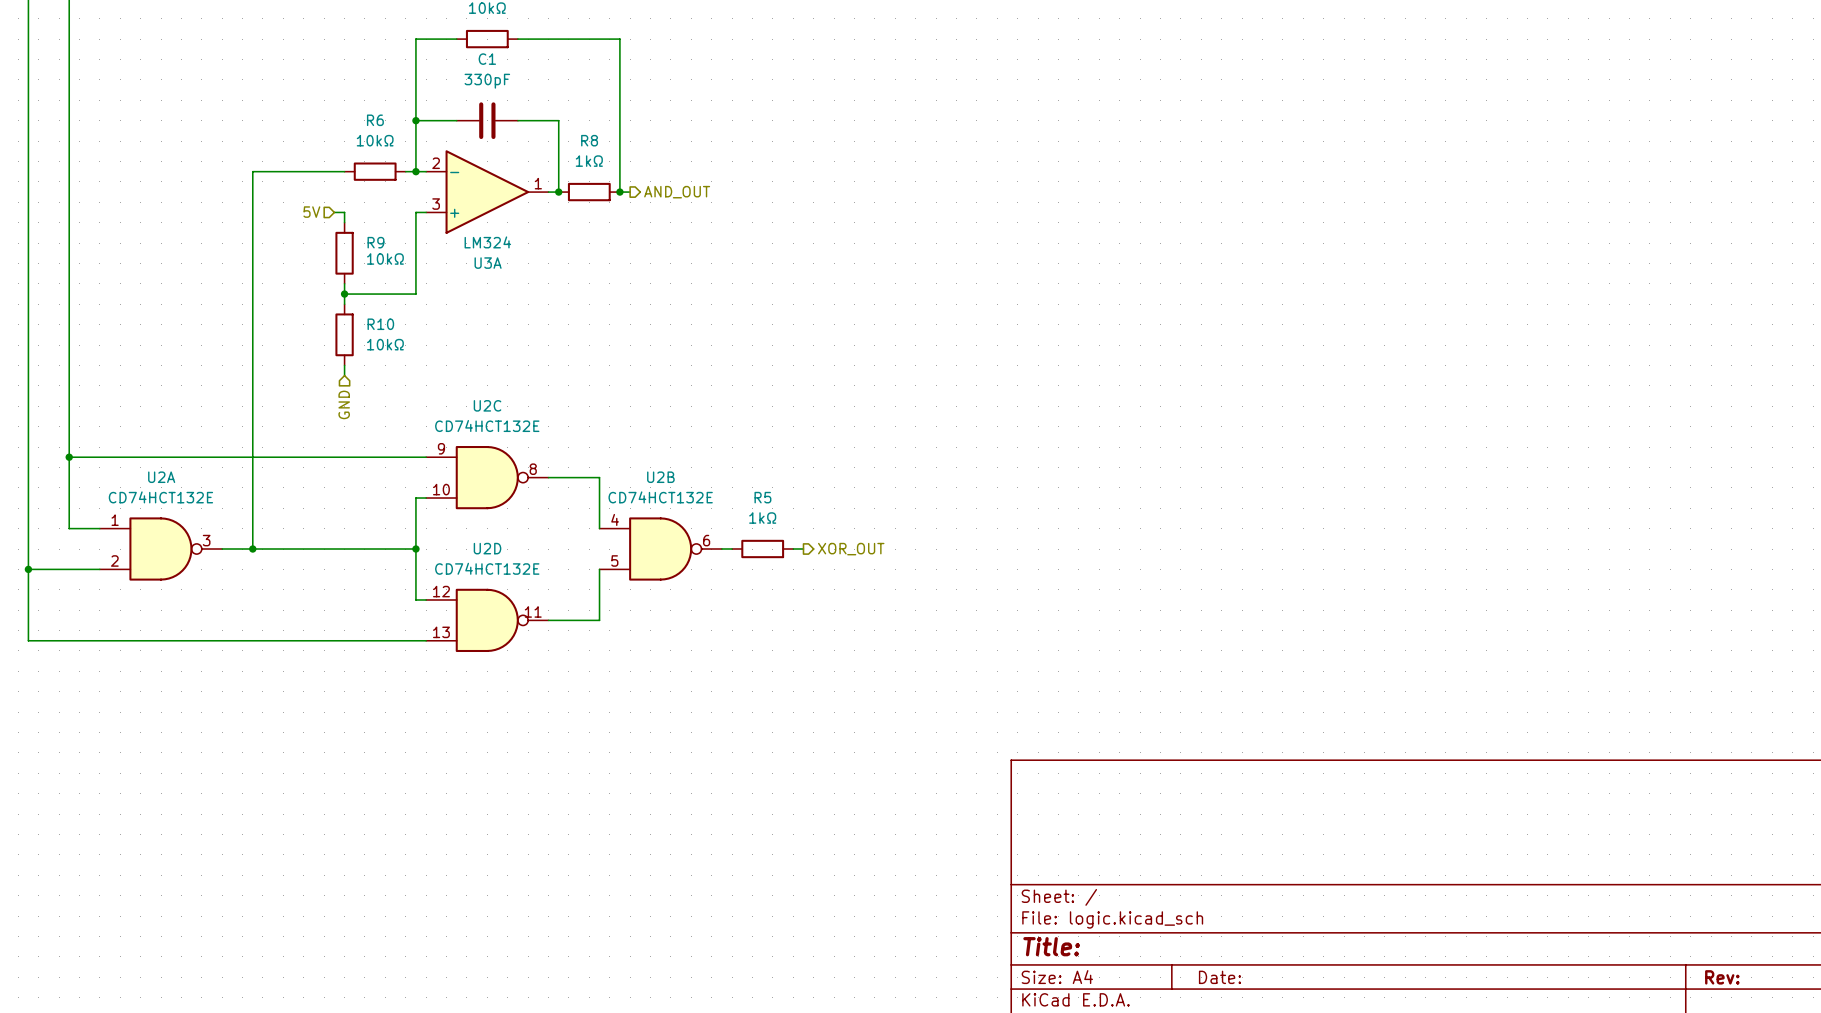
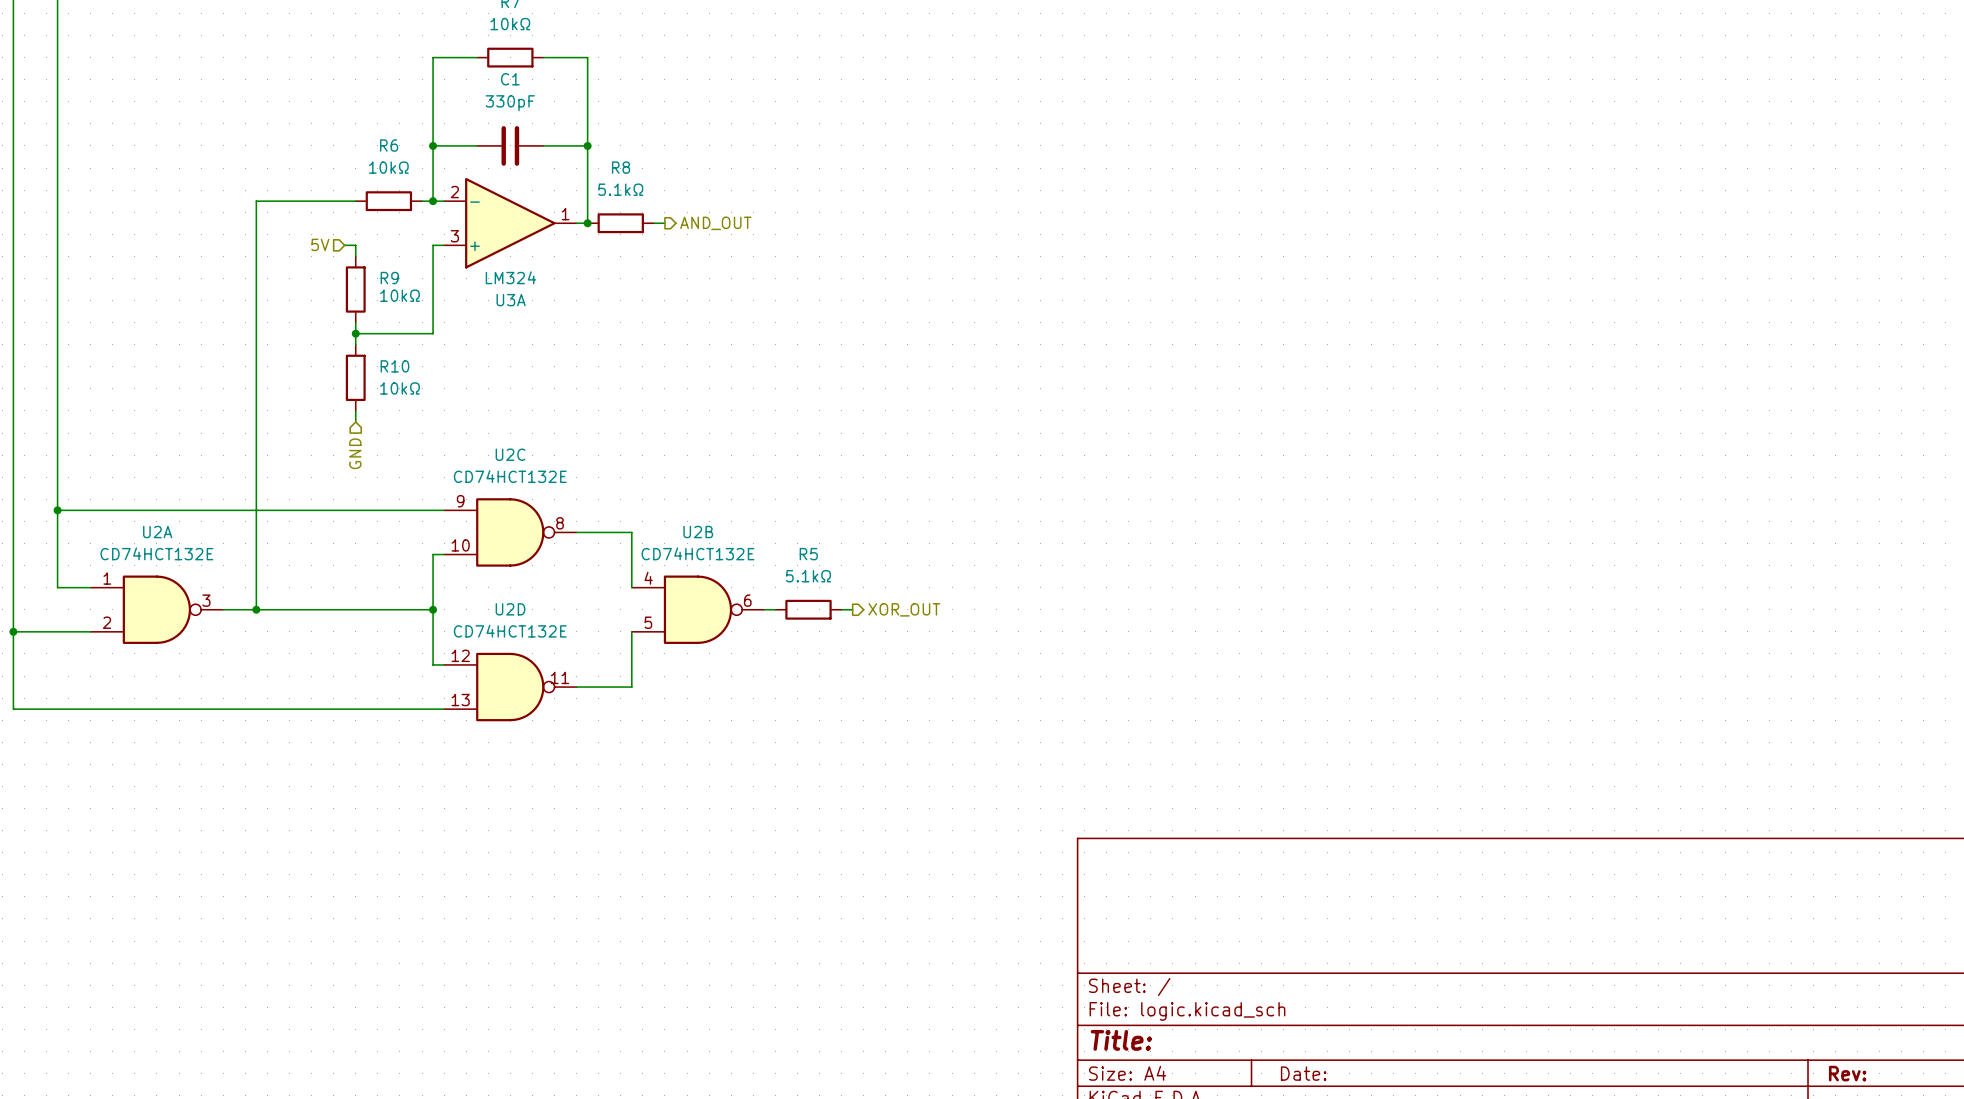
wire: (558, 39) (619, 39) (619, 192) -> (587, 57) (587, 145)
junction: none -> (587, 145)
R8 value: 1kΩ (589, 161) -> 5.1kΩ (620, 189)
junction: (619, 192) -> none
R5 value: 1kΩ (762, 518) -> 5.1kΩ (808, 576)

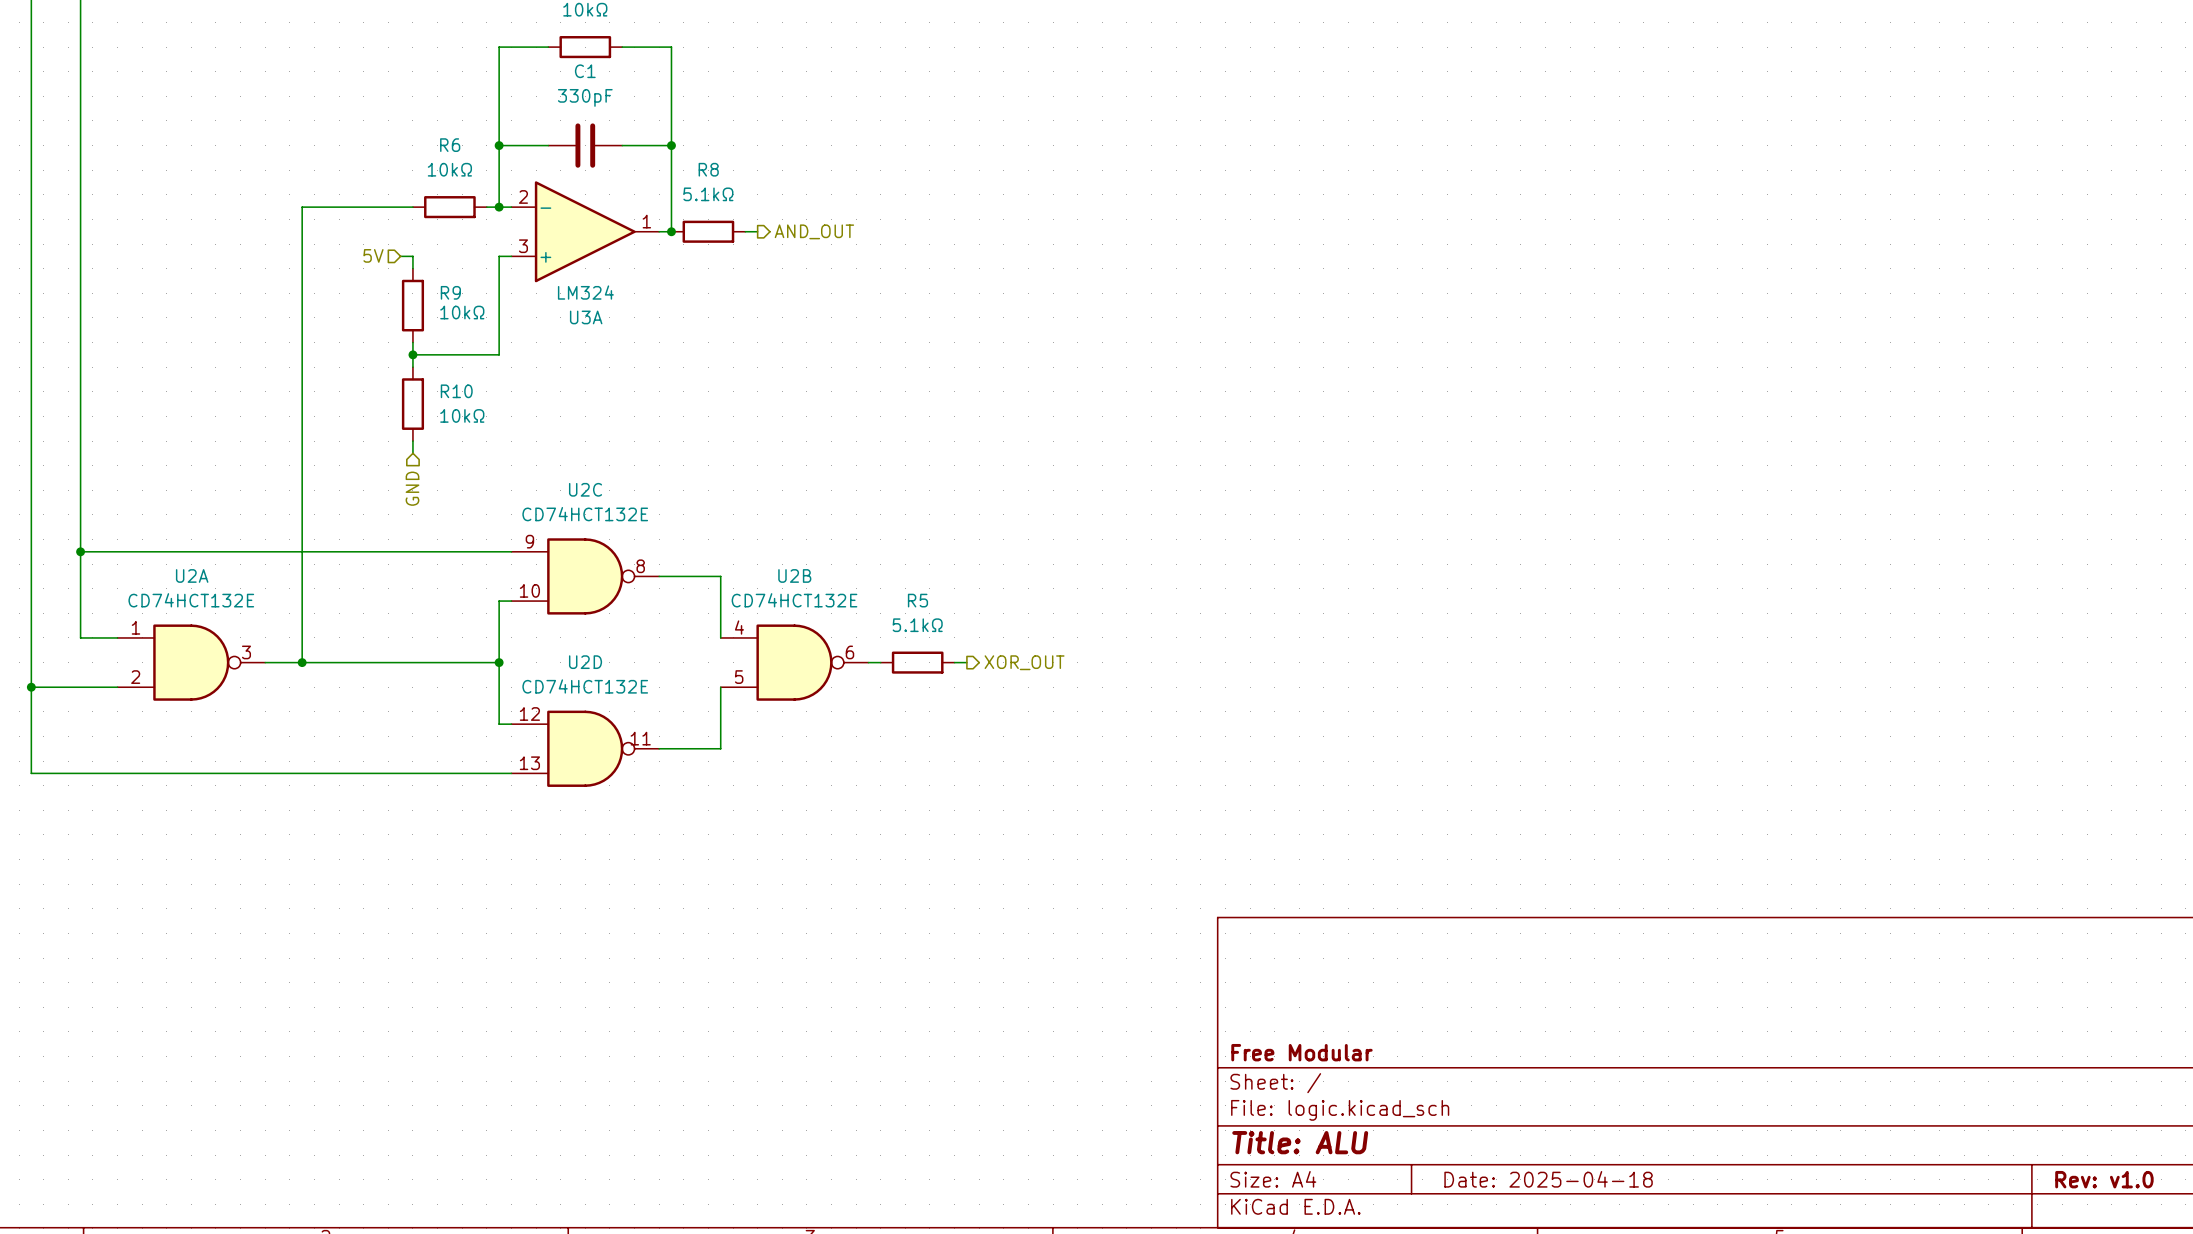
title block: none -> Free Modular (1301, 1052)
title block: Title: (1121, 1040) -> Title: ALU (1300, 1142)
title block: Date: (1303, 1073) -> Date: 2025-04-18 (1548, 1179)
title block: Rev: (1847, 1073) -> Rev: v1.0 (2104, 1179)

